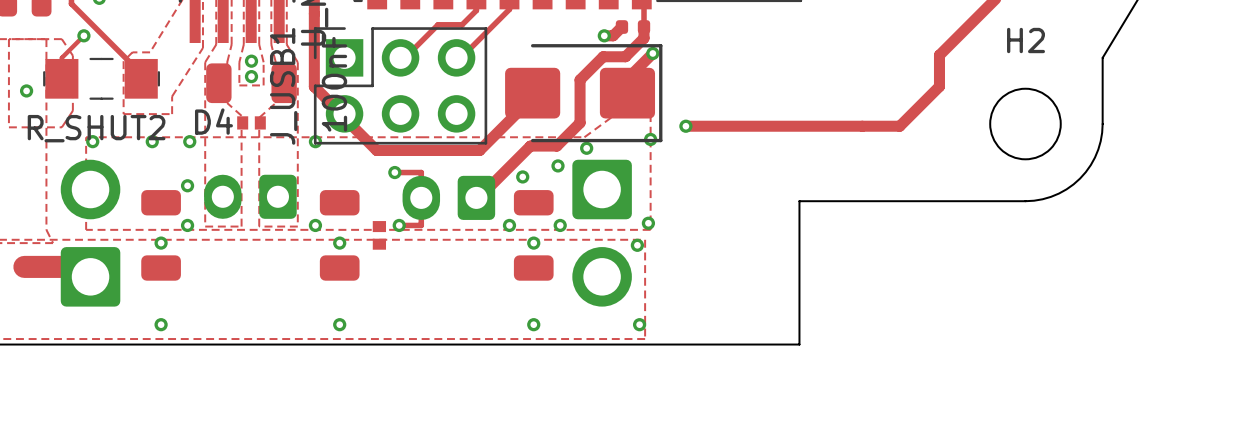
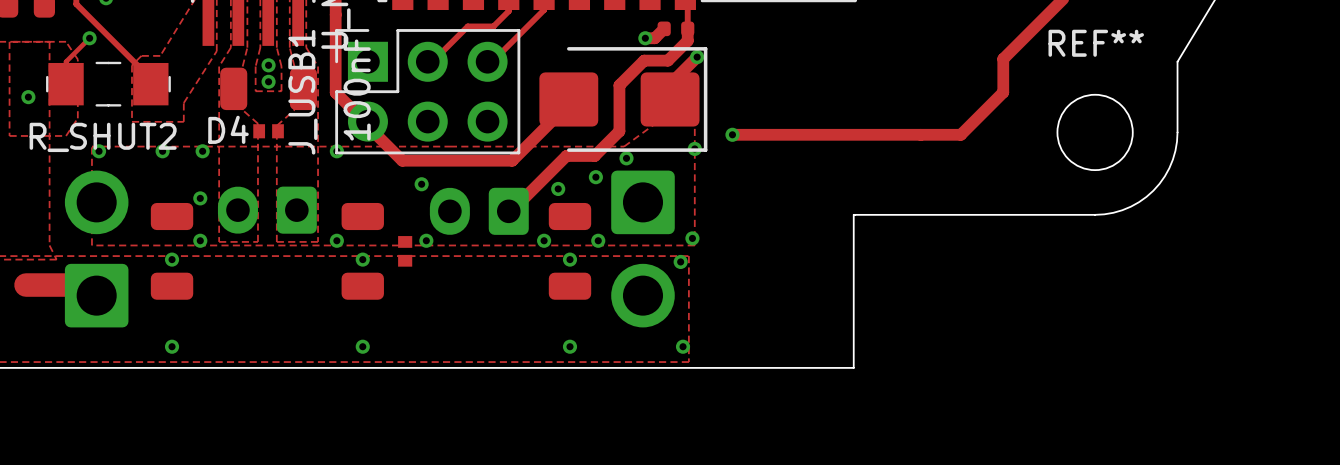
H2 name: H2 (1026, 40) -> REF** (1096, 43)
track: (394, 172) (421, 172) (421, 225) (399, 225) -> none

